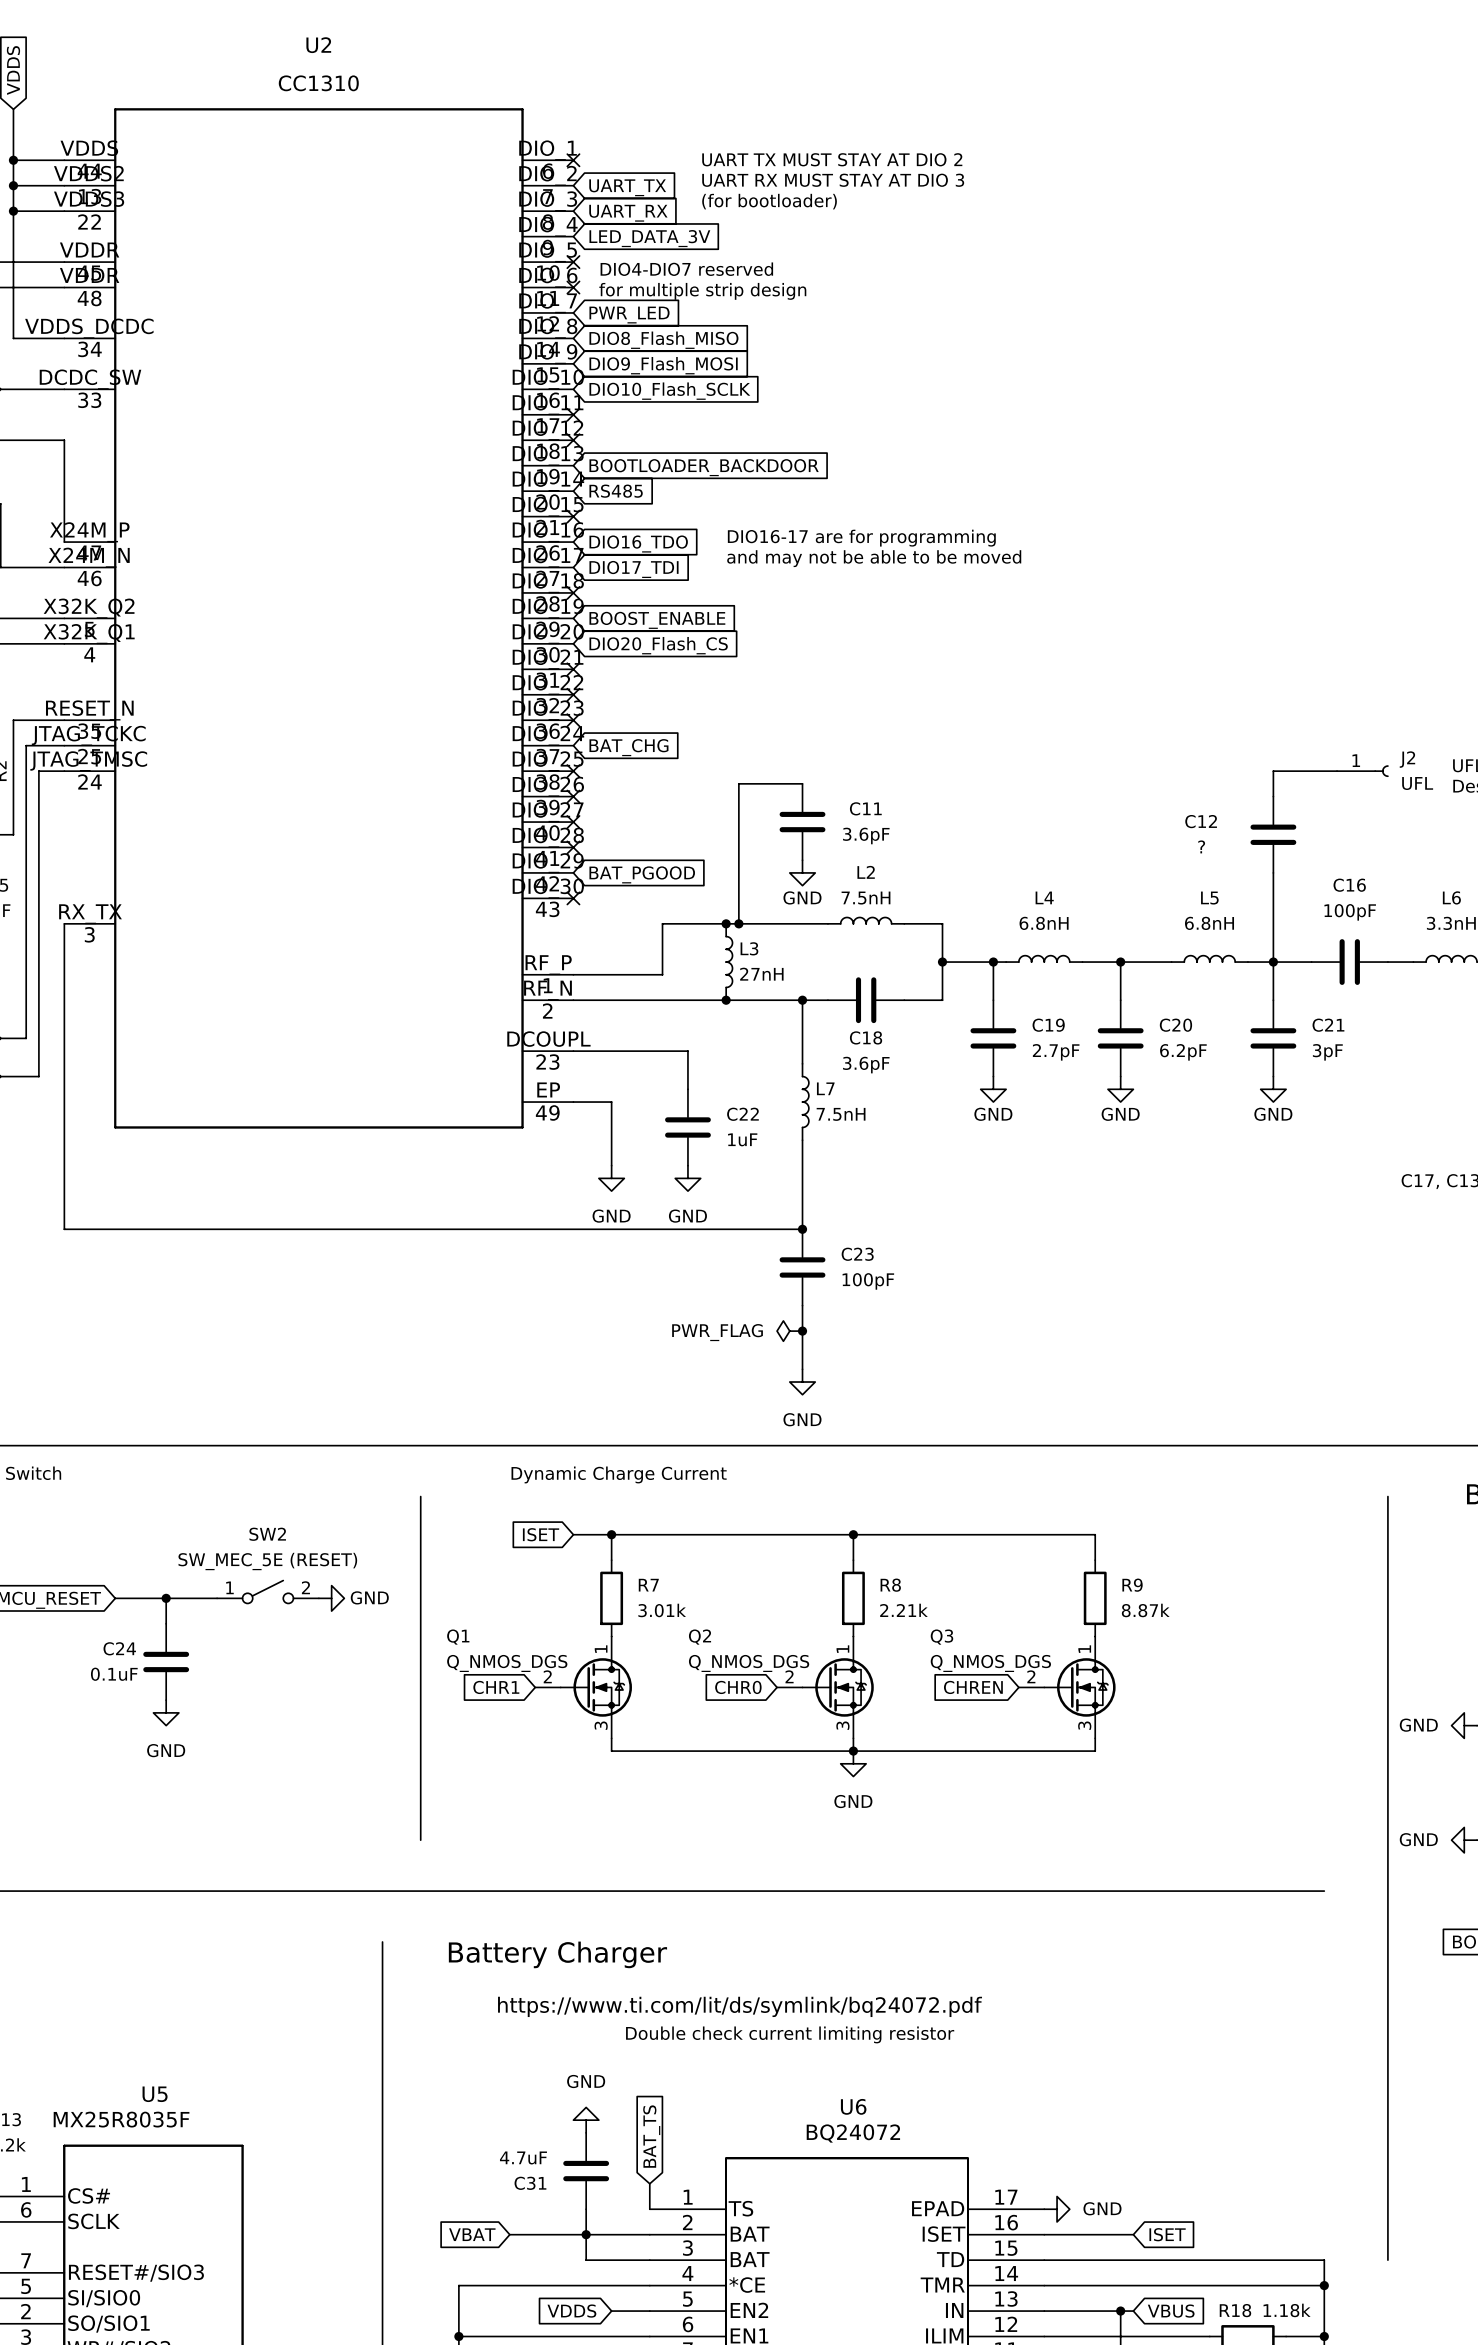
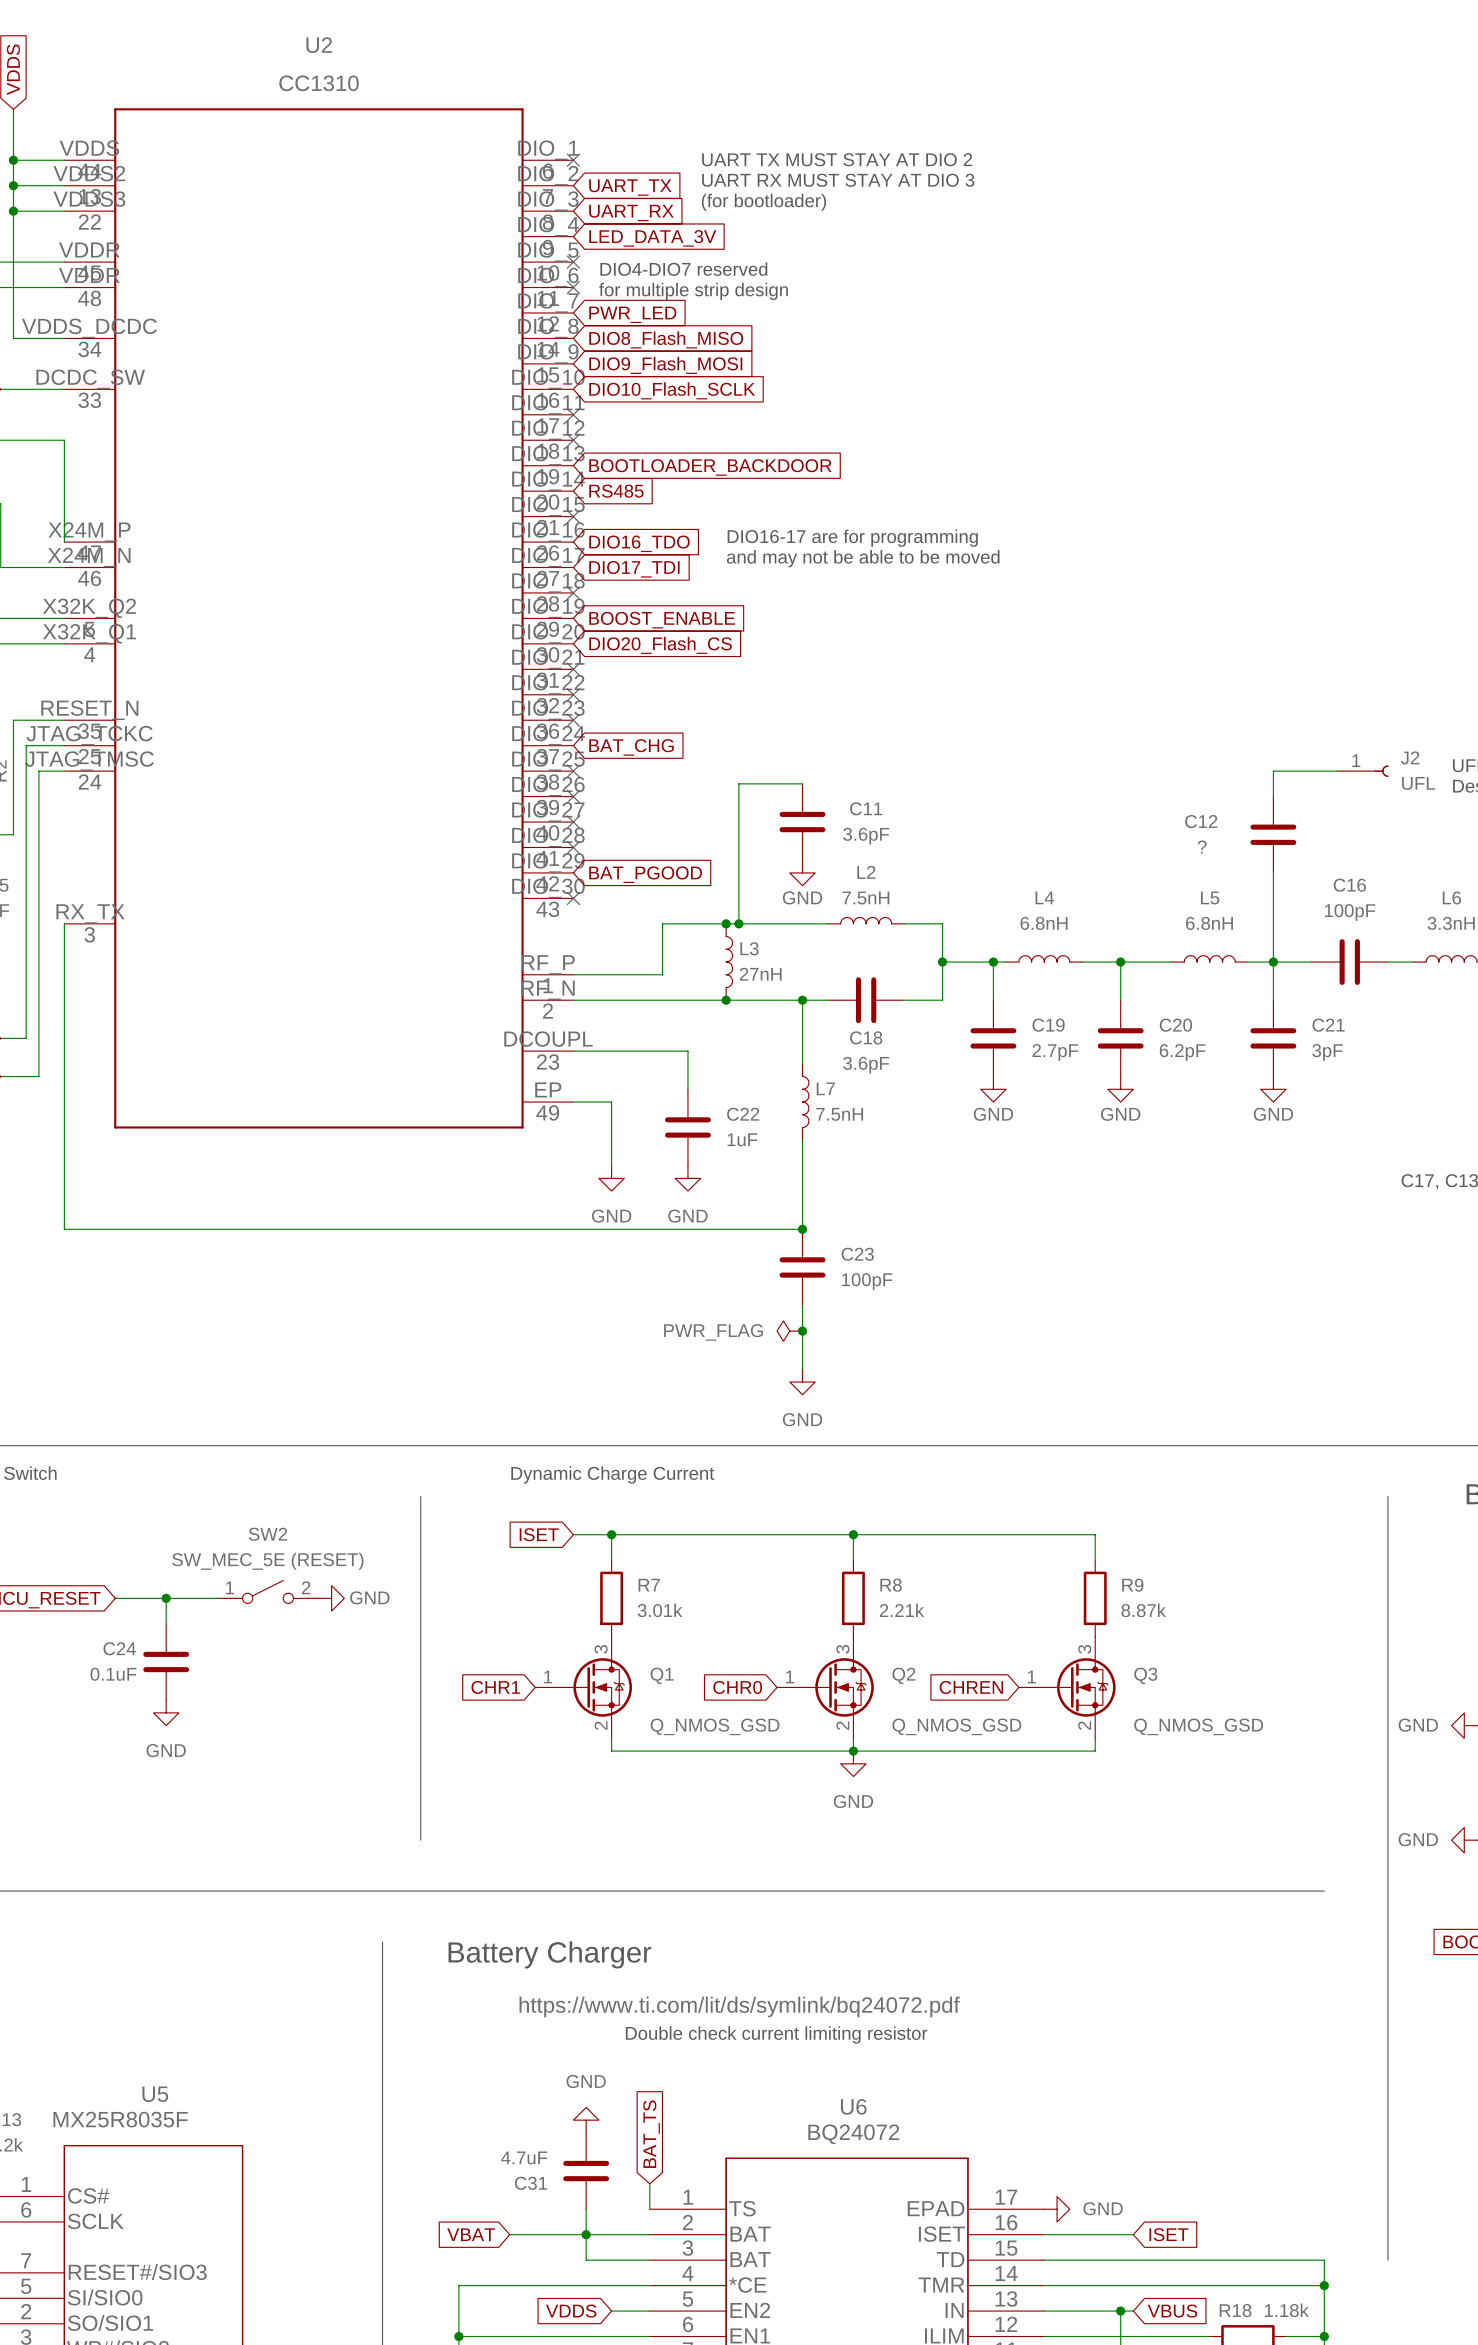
Q1 name position: Q1 (458, 1637) -> Q1 (662, 1675)
Q2 name position: Q2 (700, 1637) -> Q2 (903, 1675)
Q3 name position: Q3 (941, 1637) -> Q3 (1145, 1675)
Q1 pin number: 1 (601, 1649) -> 3 (601, 1649)
Q2 pin number: 1 (842, 1649) -> 3 (842, 1649)
Q3 pin number: 1 (1084, 1649) -> 3 (1084, 1649)
Q1 value: Q_NMOS_DGS (507, 1663) -> Q_NMOS_GSD (715, 1726)
Q2 value: Q_NMOS_DGS (749, 1663) -> Q_NMOS_GSD (956, 1726)
Q3 value: Q_NMOS_DGS (990, 1663) -> Q_NMOS_GSD (1198, 1726)
Q1 pin number: 2 (547, 1676) -> 1 (548, 1676)
Q2 pin number: 2 (789, 1676) -> 1 (790, 1676)
Q3 pin number: 2 (1031, 1676) -> 1 (1031, 1676)
Q1 pin number: 3 (601, 1725) -> 2 (601, 1725)
Q2 pin number: 3 (842, 1725) -> 2 (842, 1725)
Q3 pin number: 3 (1084, 1725) -> 2 (1084, 1725)

